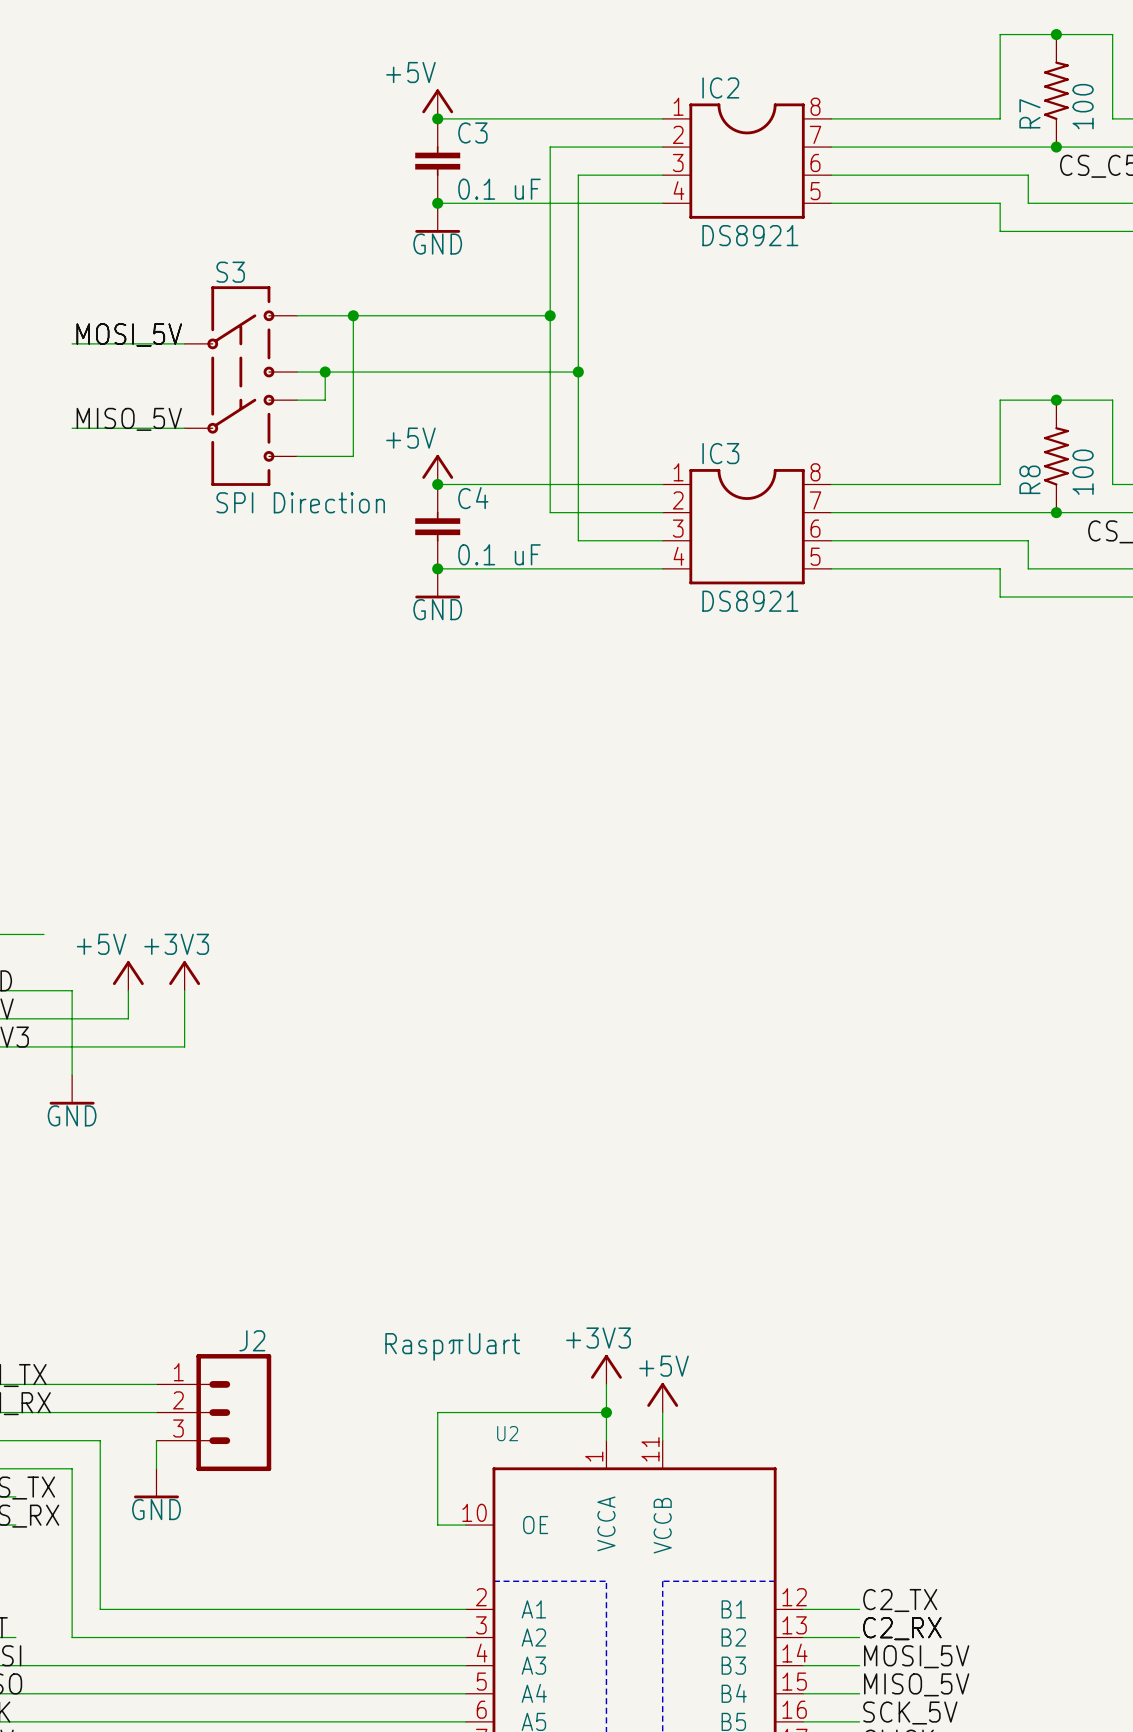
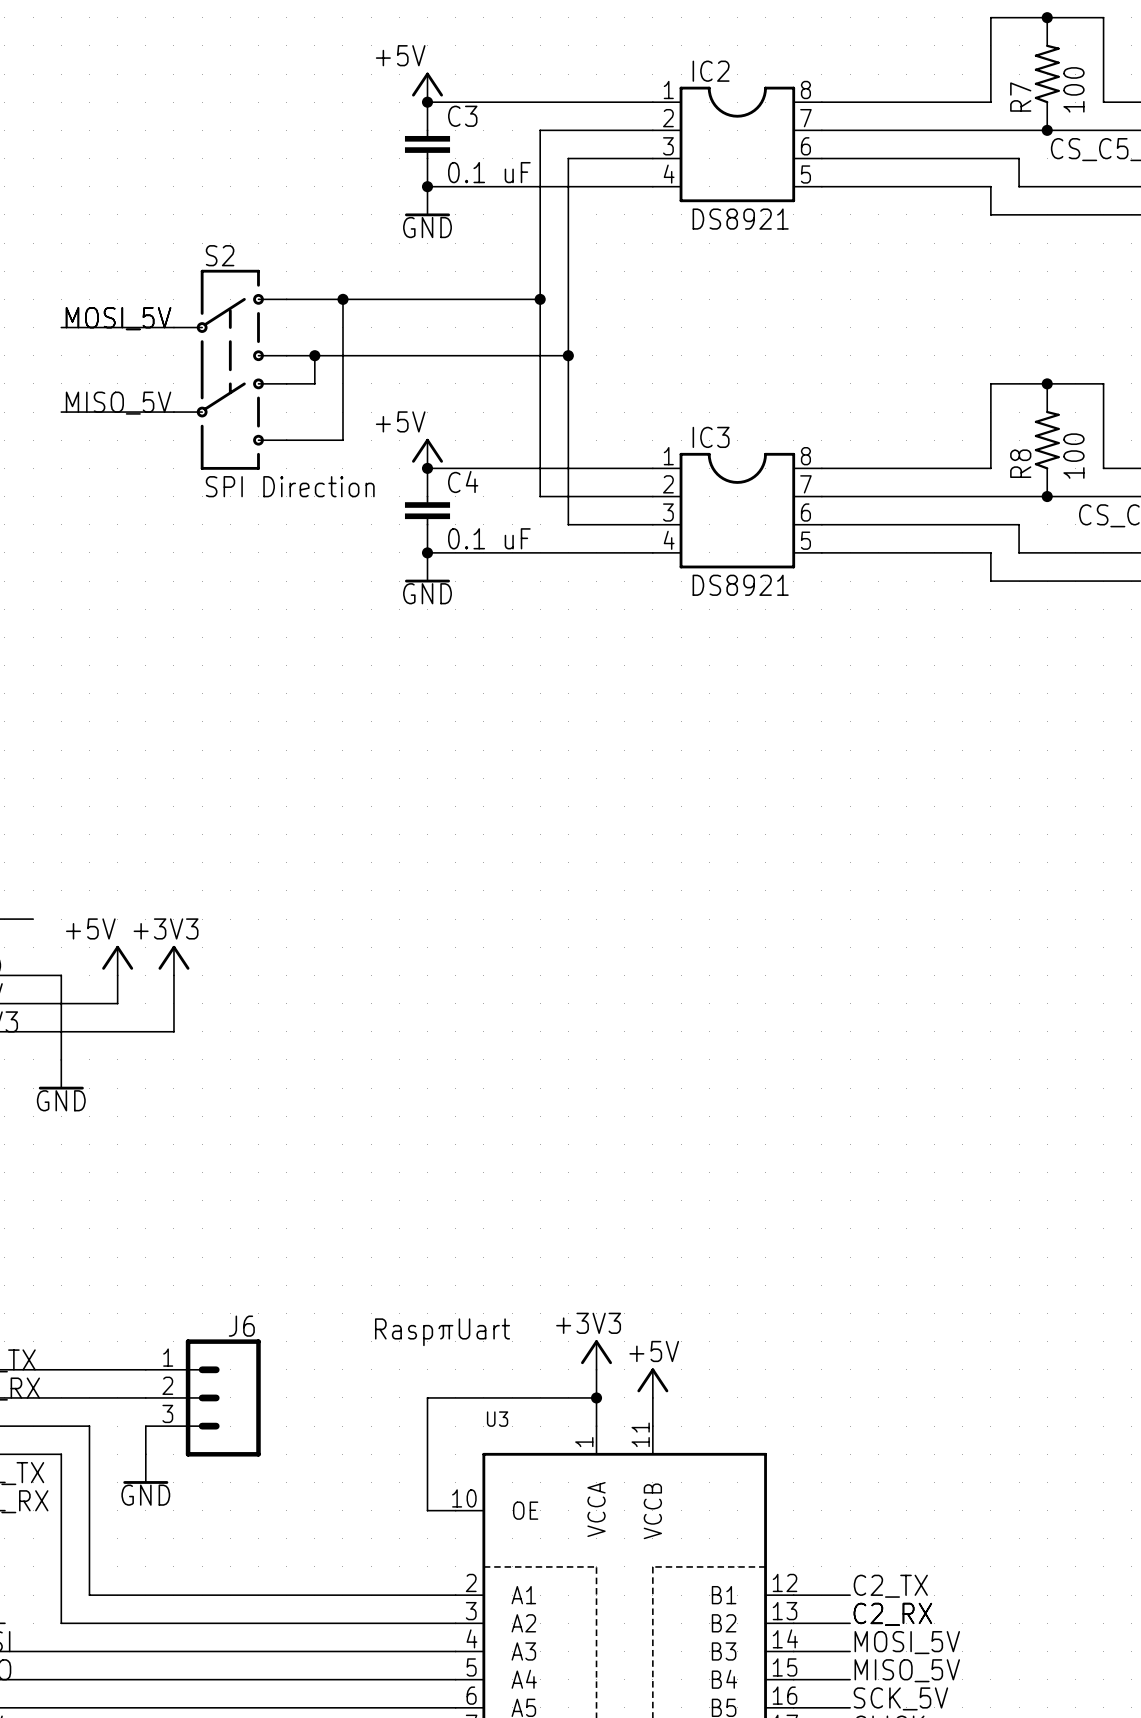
S3 name: S3 (230, 272) -> S2 (220, 255)
J2 name: J2 (252, 1340) -> J6 (241, 1326)
U2 name: U2 (507, 1433) -> U3 (497, 1419)

